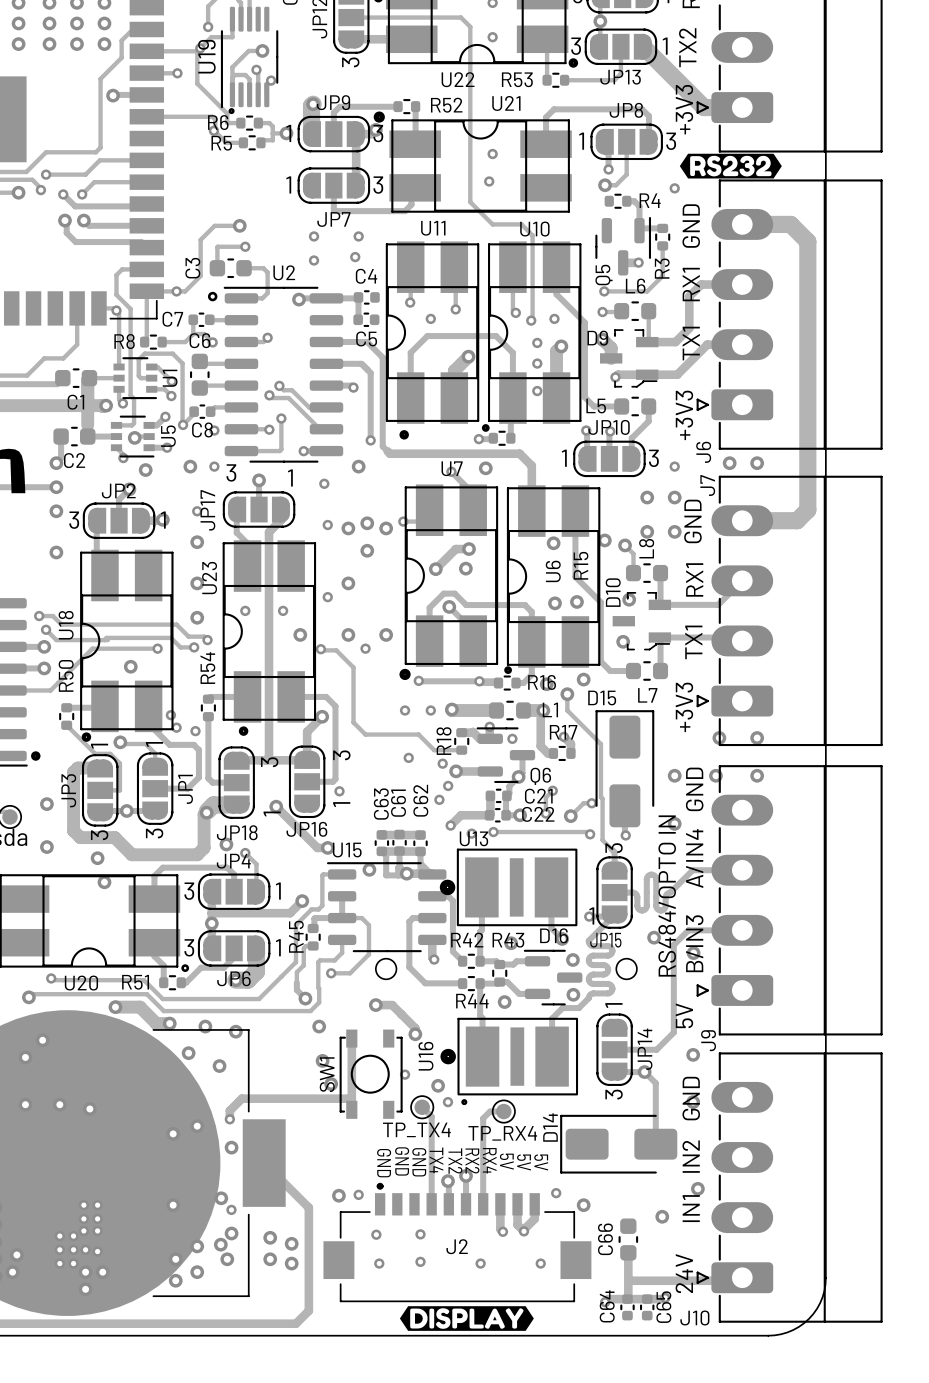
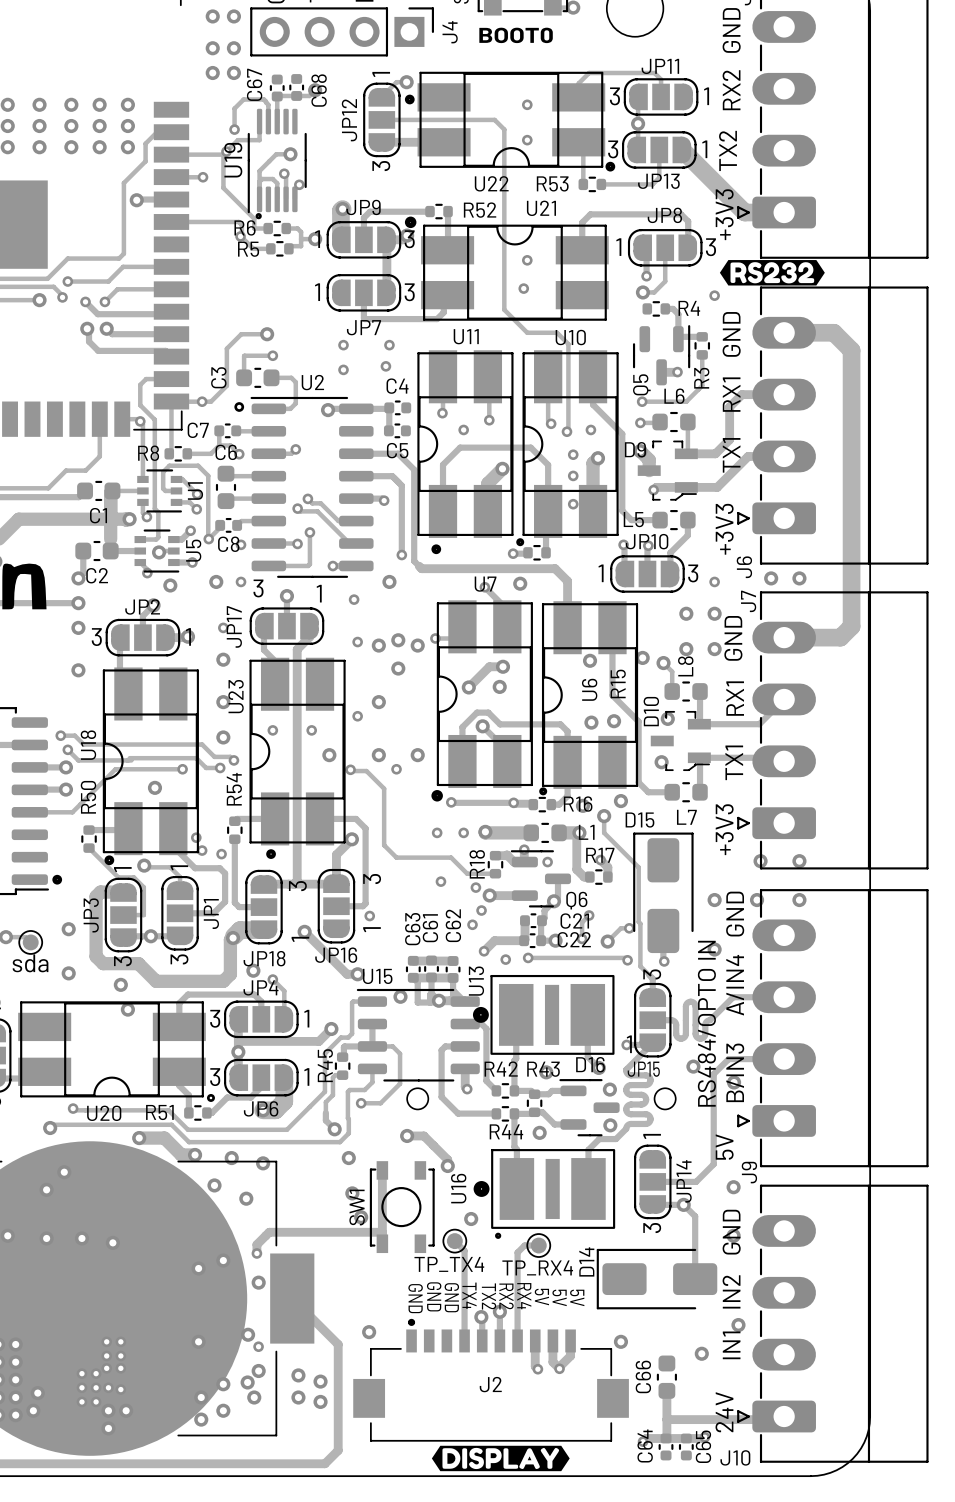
U13 name rotation: 0° (473, 838) -> 90° counterclockwise (476, 981)
via: (405, 1074) -> none
via: (447, 1102) -> none
via: (556, 1193) -> none
via: (358, 1194) -> none
via: (376, 1234) -> none
via: (420, 1234) -> none
via: (420, 1261) -> none
via: (379, 1263) -> none
via: (480, 1263) -> none
via: (540, 1263) -> none

